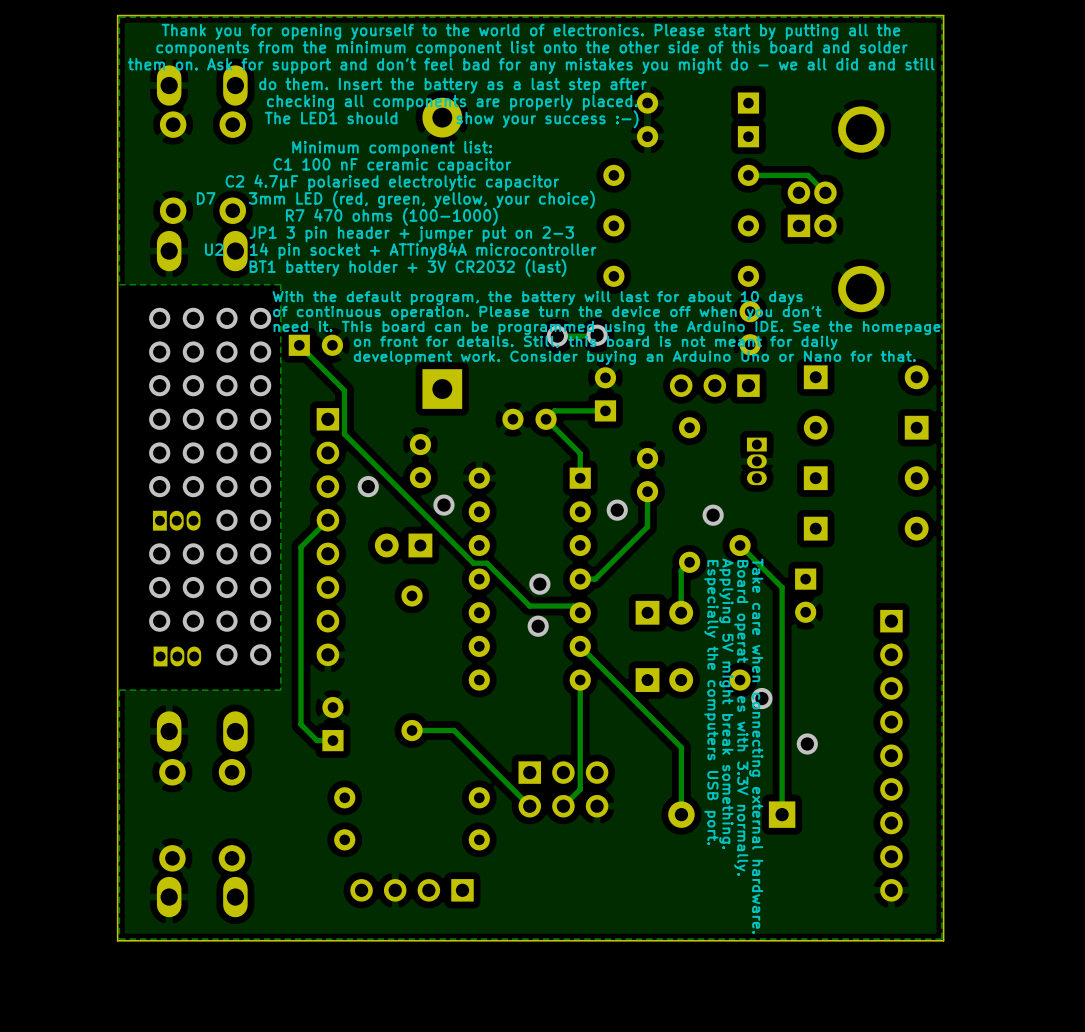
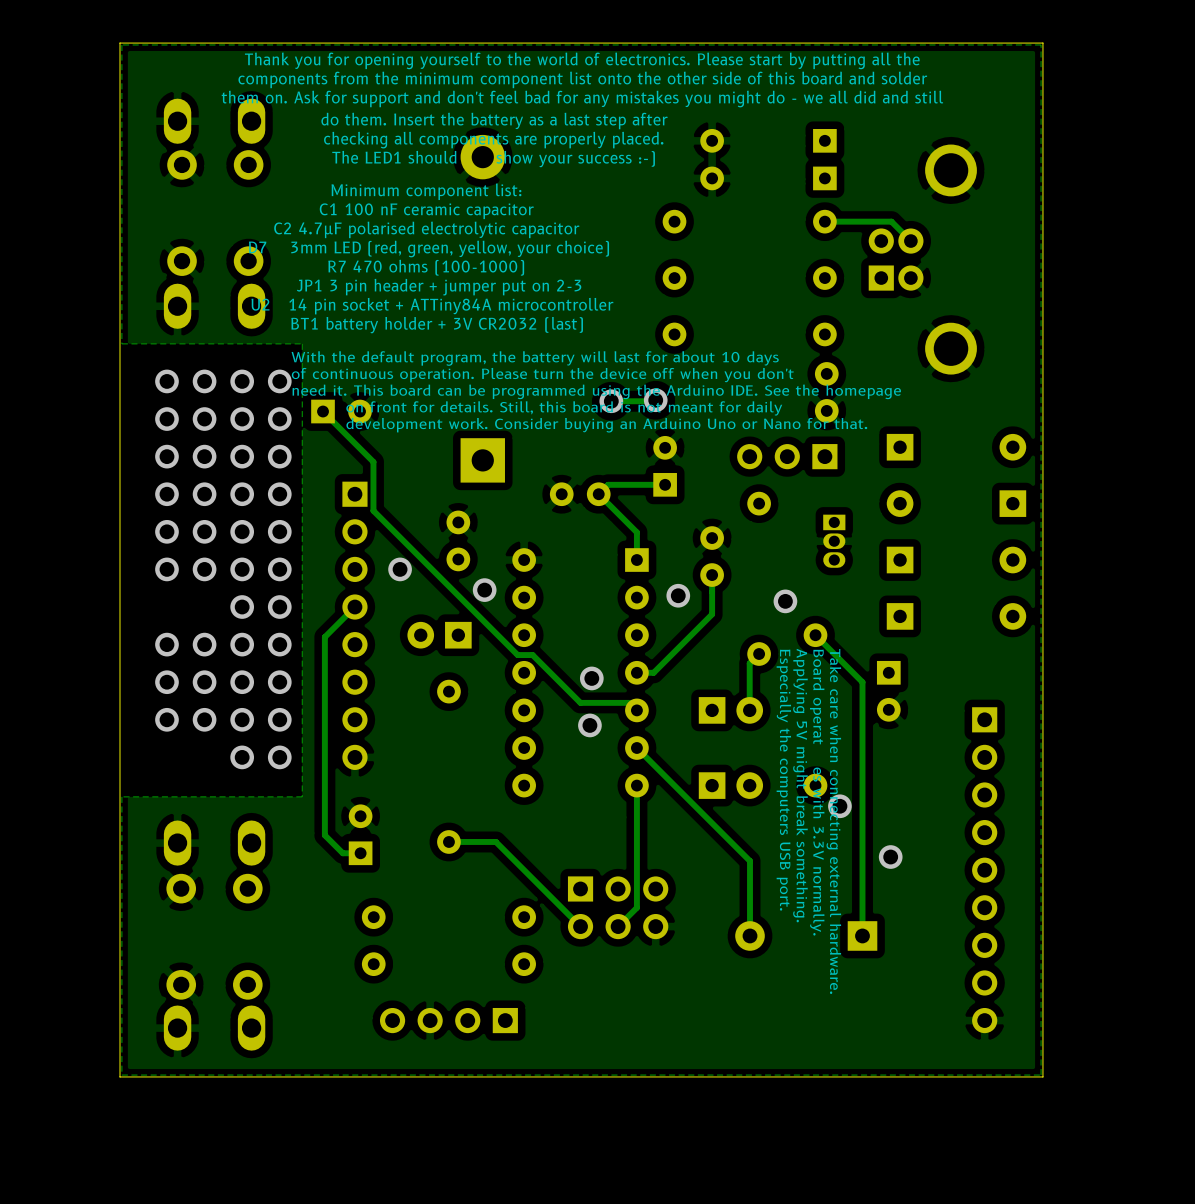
part: (176, 520) -> none
part: (177, 656) -> none

